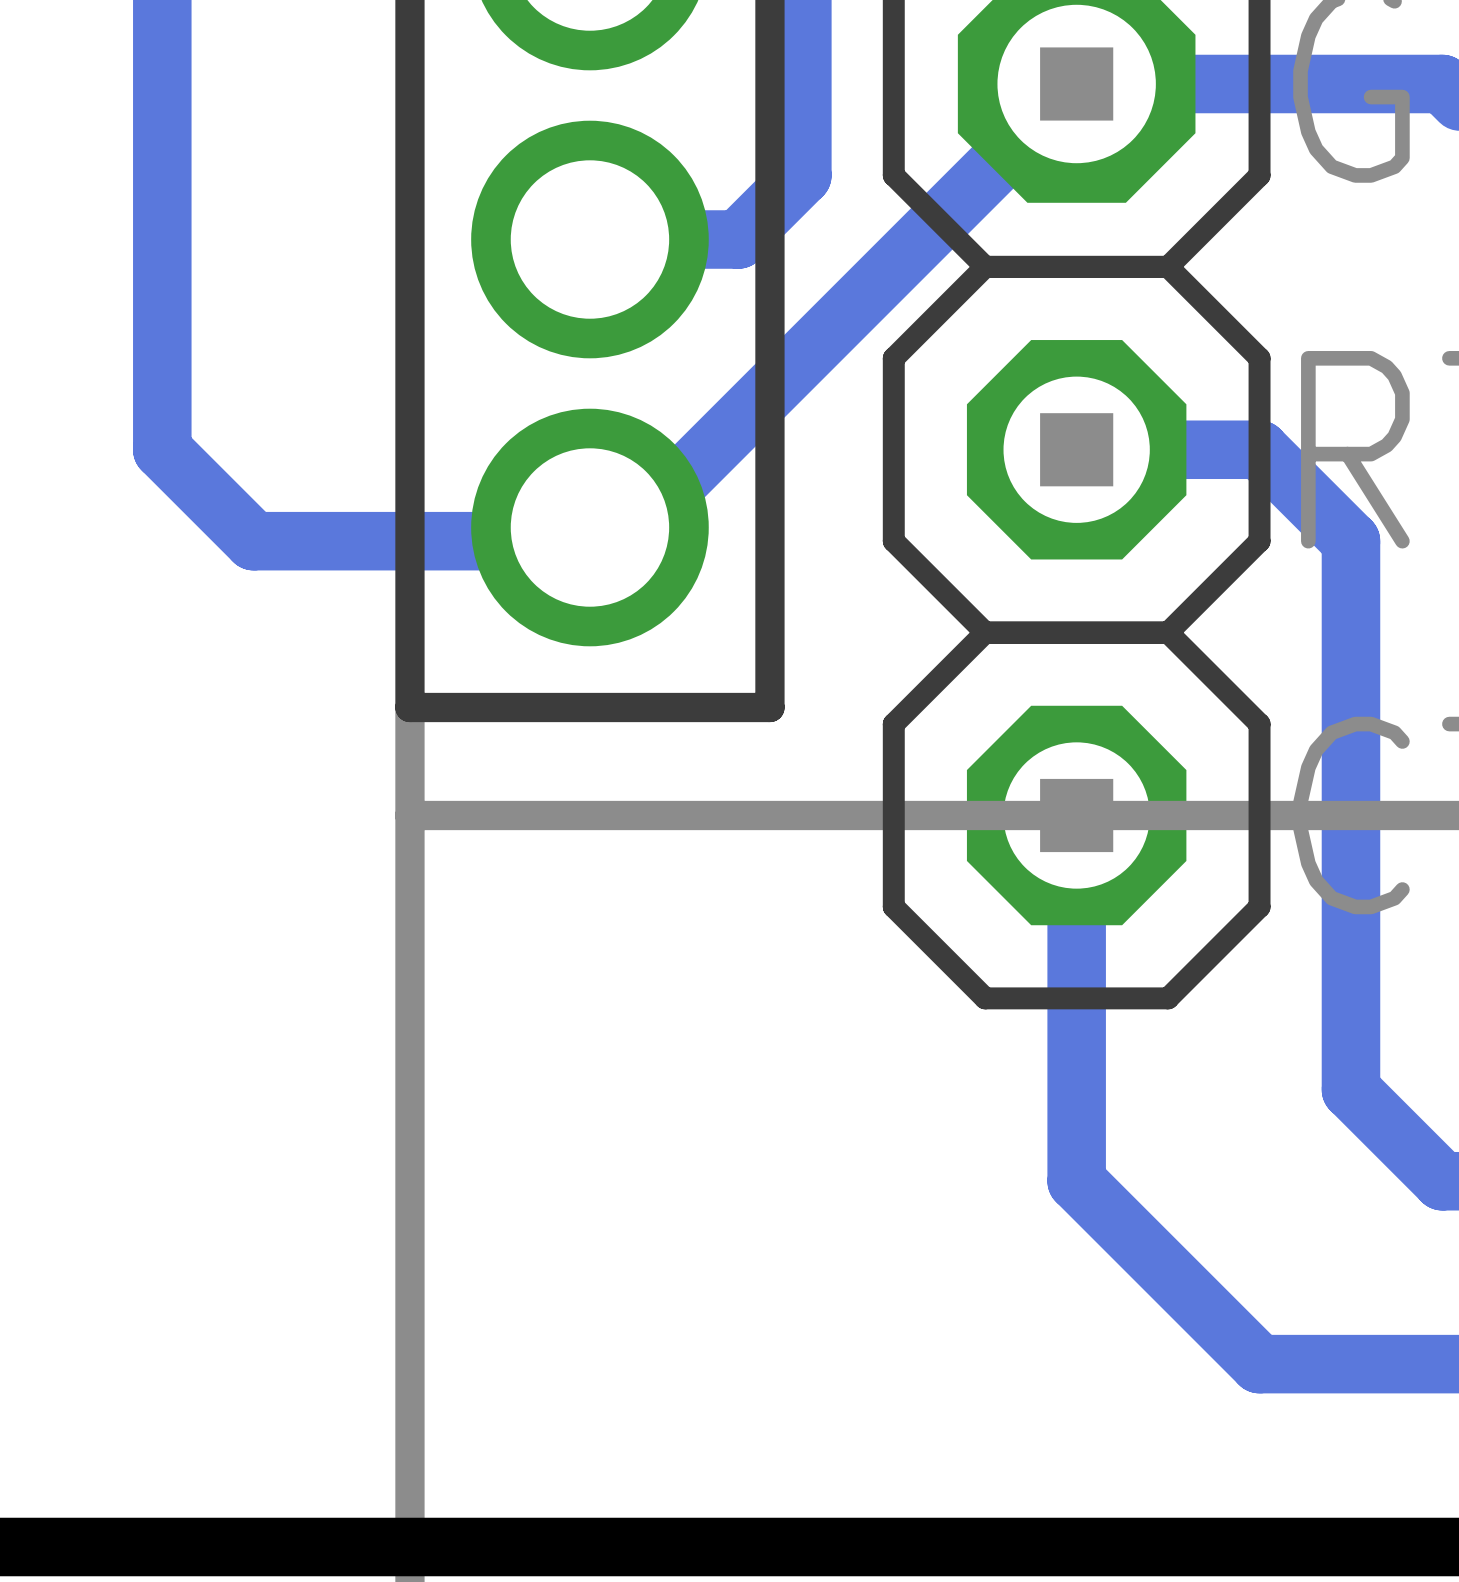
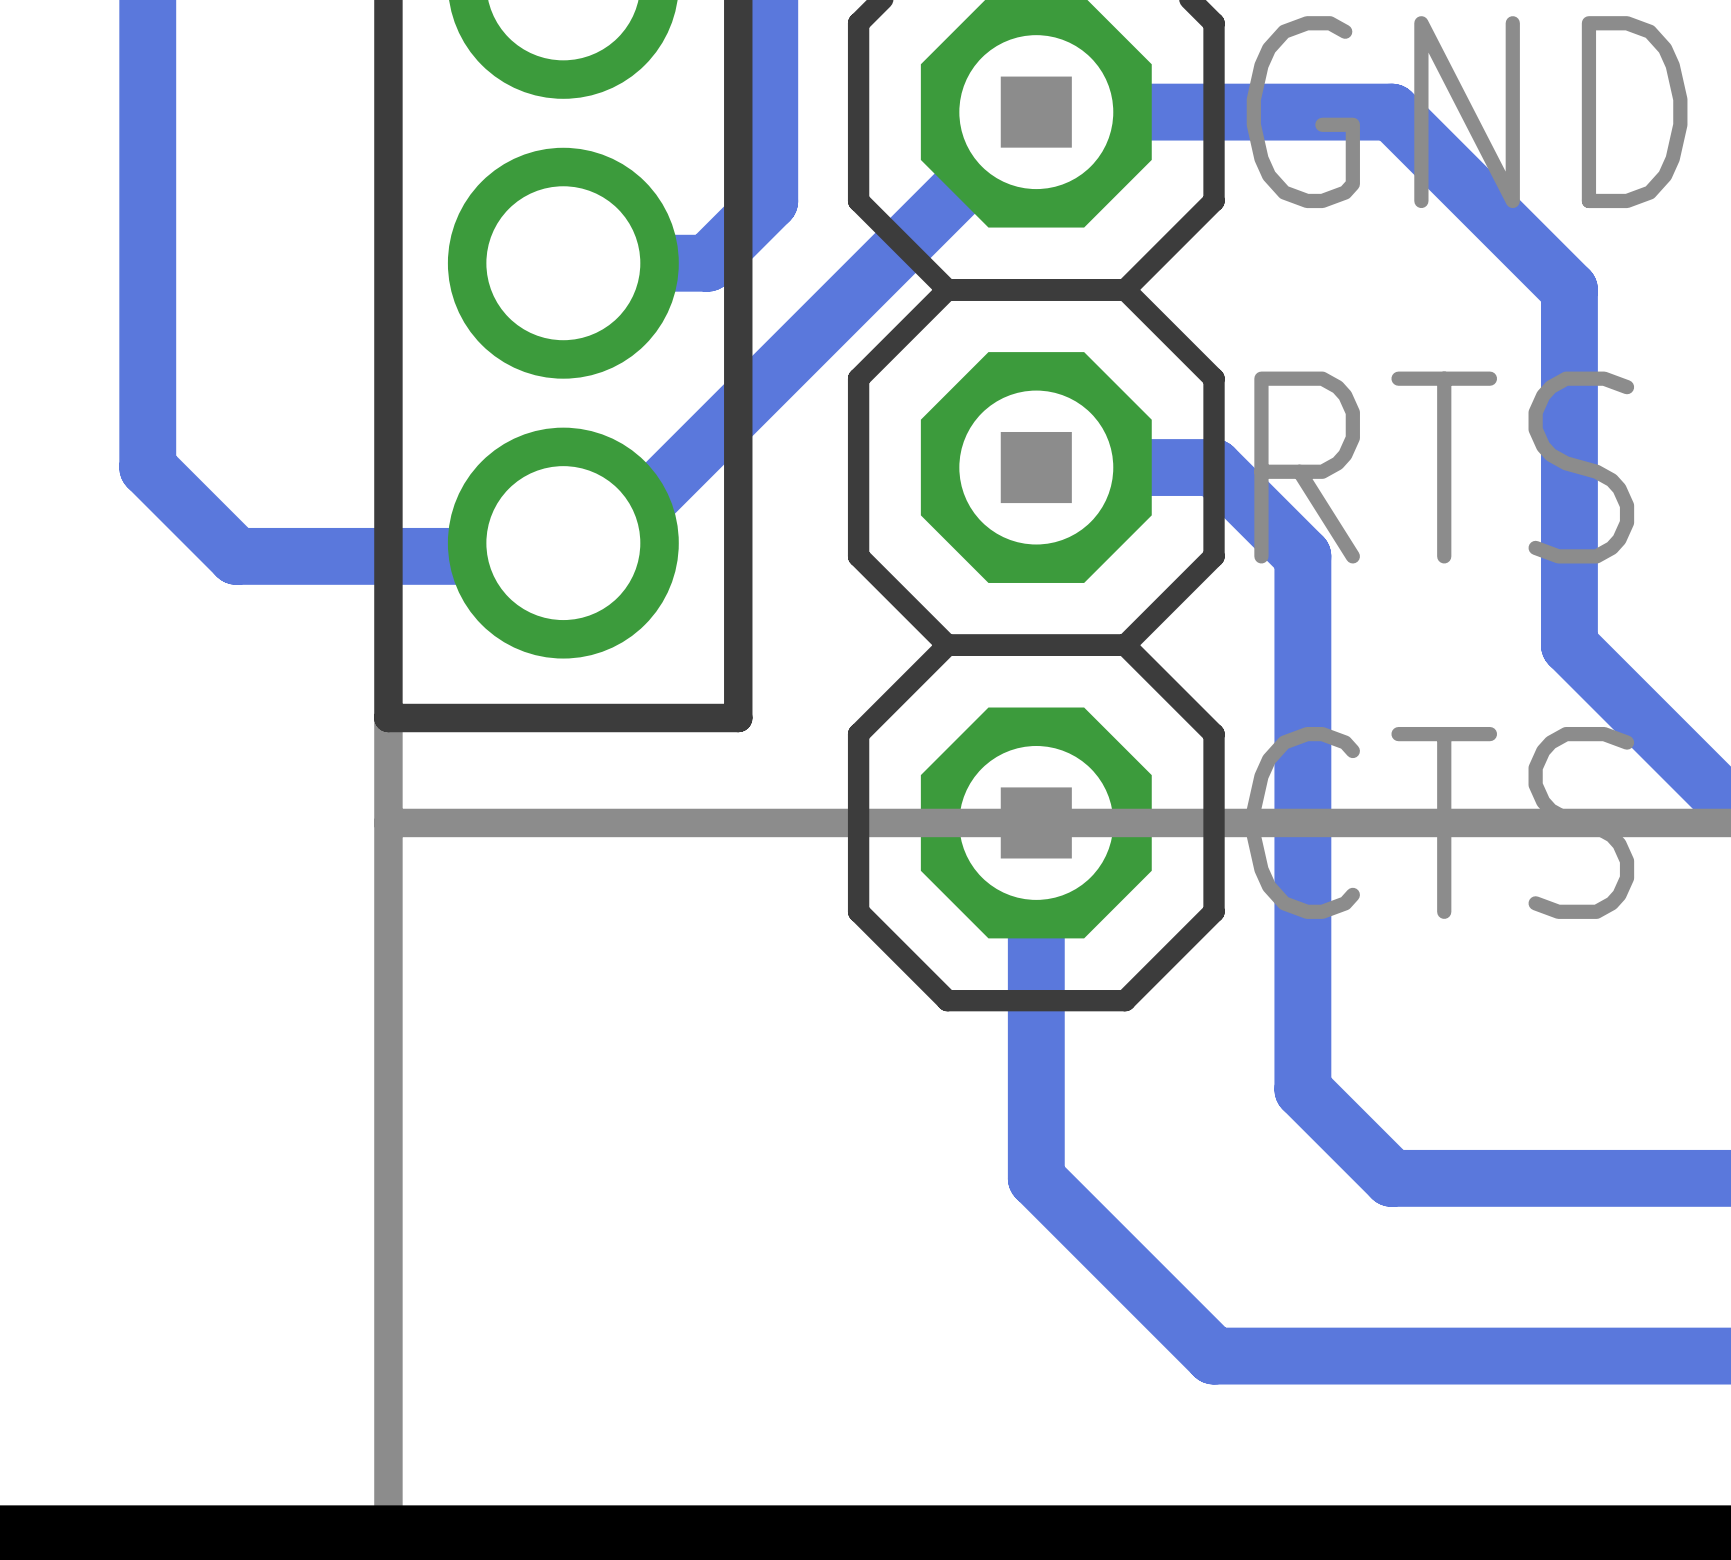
part footprint: [882, 255, 1271, 644] -> [847, 279, 1225, 656]
part footprint: [882, 621, 1271, 1010] -> [847, 634, 1225, 1012]

